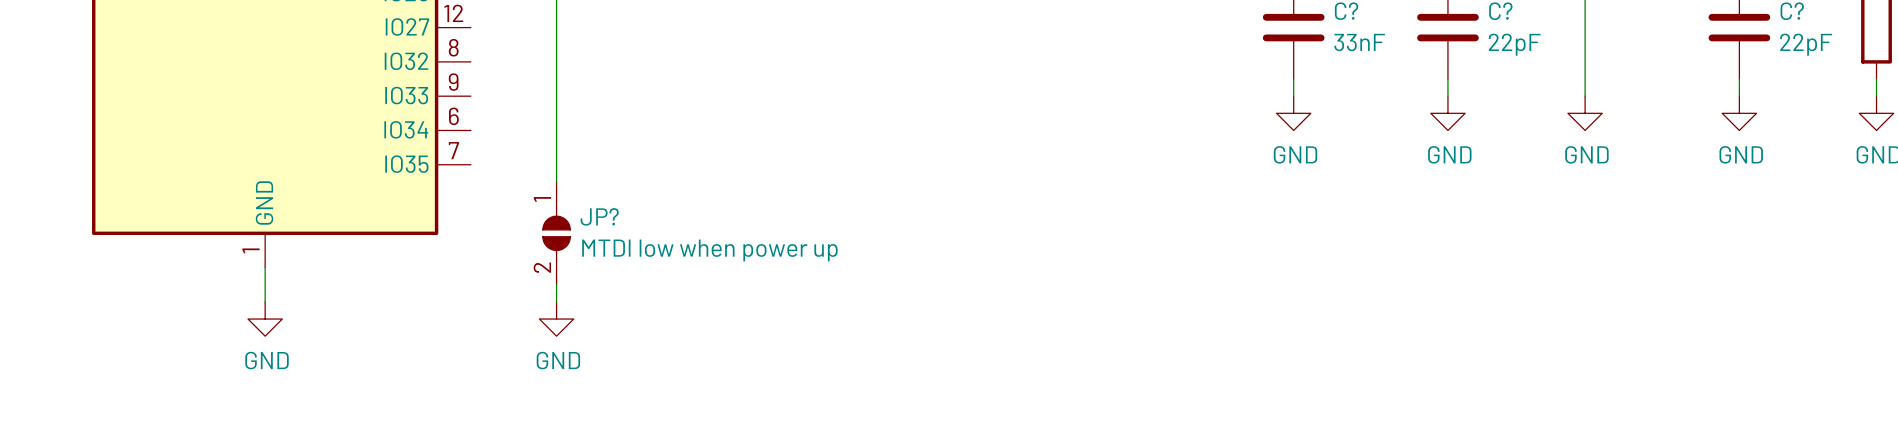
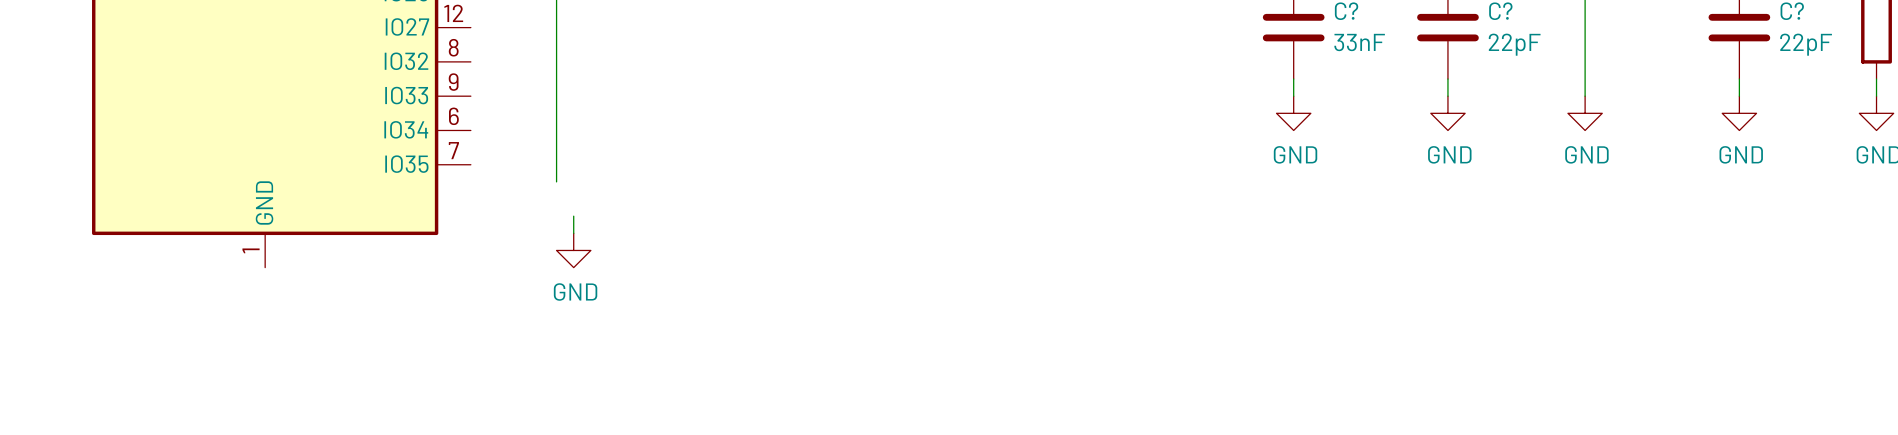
JP?: MTDI low when power up (556, 233) -> none
wire: (265, 267) (265, 301) -> none
wire: (556, 284) (556, 301) -> (573, 216) (573, 233)
power symbol: GND (265, 319) -> none
power symbol position: GND (556, 319) -> GND (573, 250)

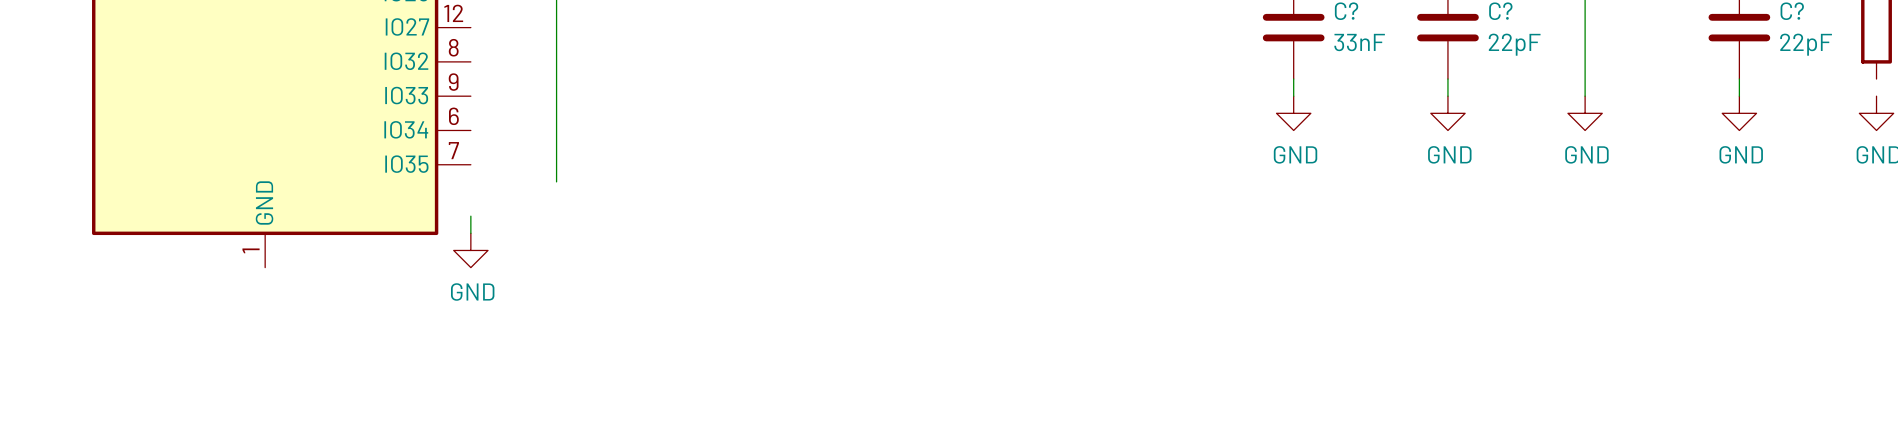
wire: (1876, 79) (1876, 96) -> none
wire: (573, 216) (573, 233) -> (470, 216) (470, 233)
power symbol position: GND (573, 250) -> GND (470, 250)

